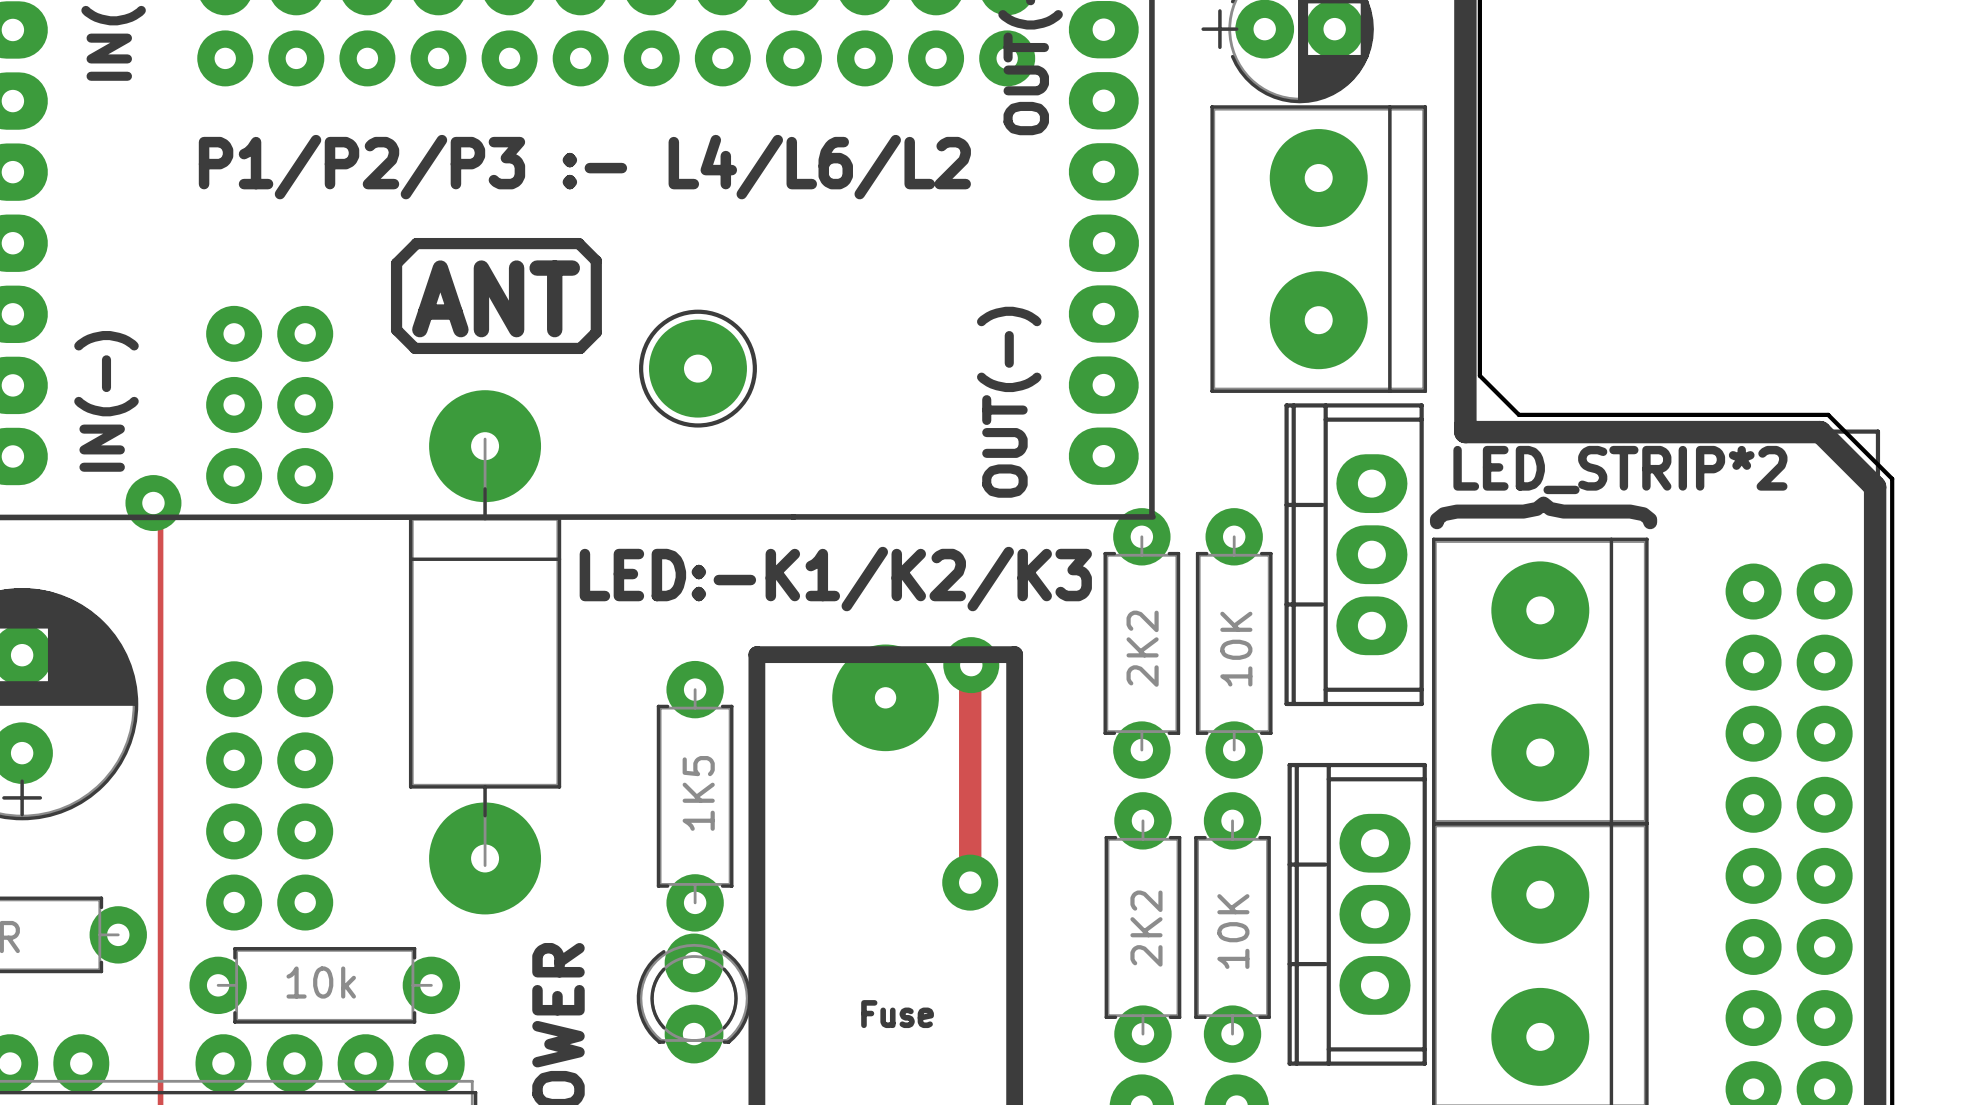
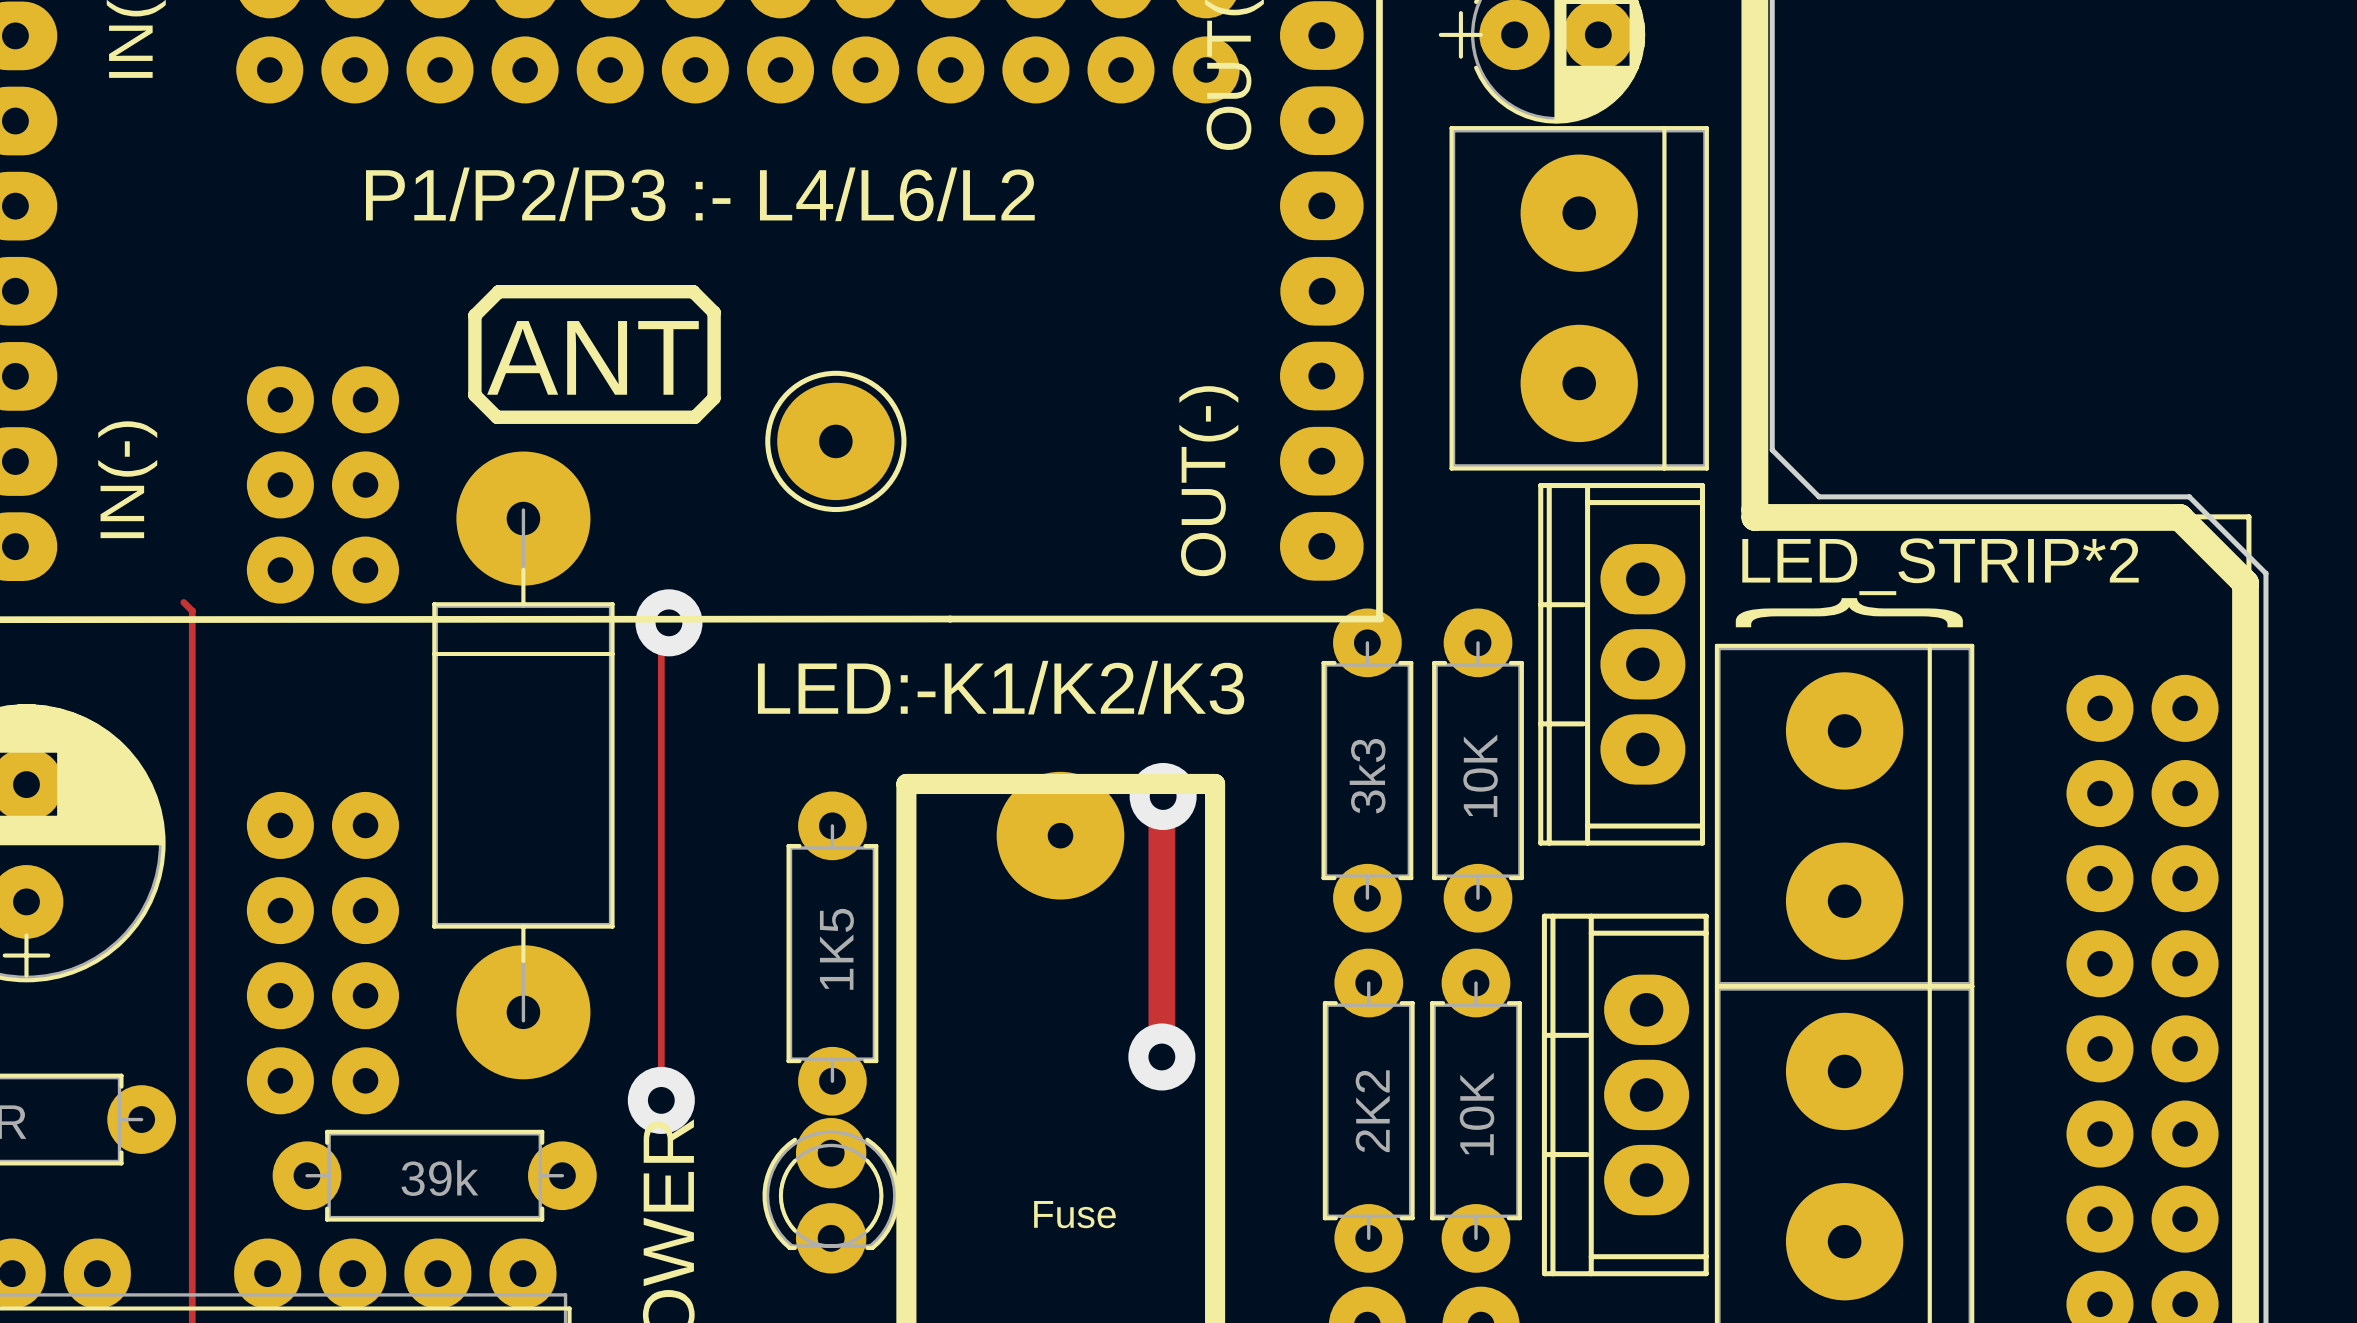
via: (153, 503) -> none
track: none -> (668, 622) (661, 630) (661, 1100)
via: none -> (668, 622)
part value: 2K2 (1142, 648) -> 3k3 (1367, 776)
part position: (485, 652) -> (523, 765)
via: none -> (661, 1100)
part: none -> 39k (434, 1175)
part: 10k (324, 985) -> none

